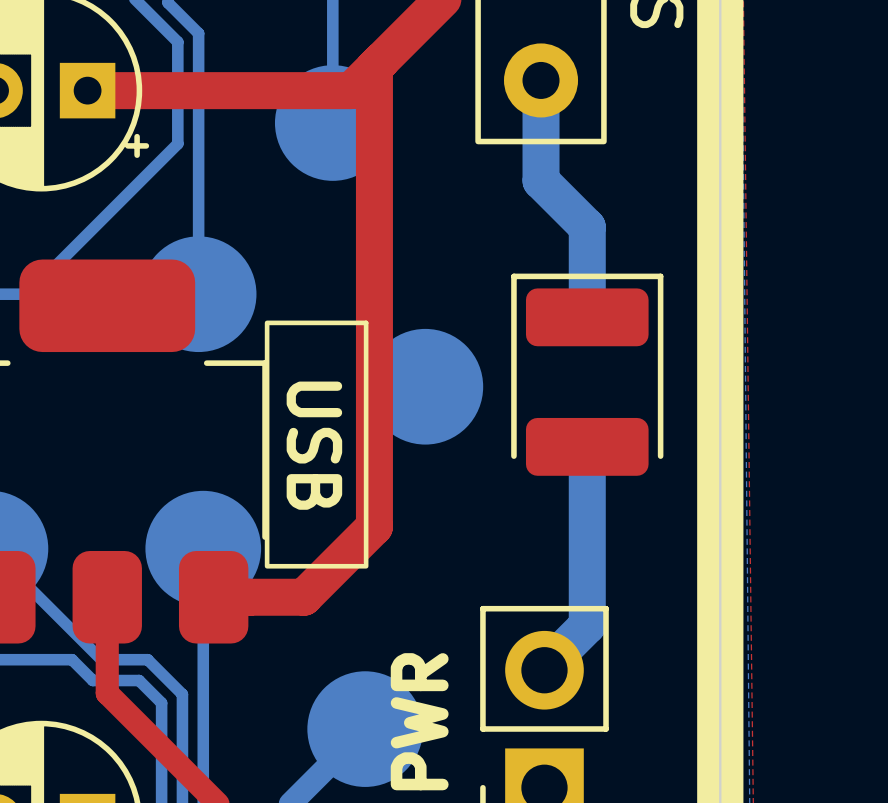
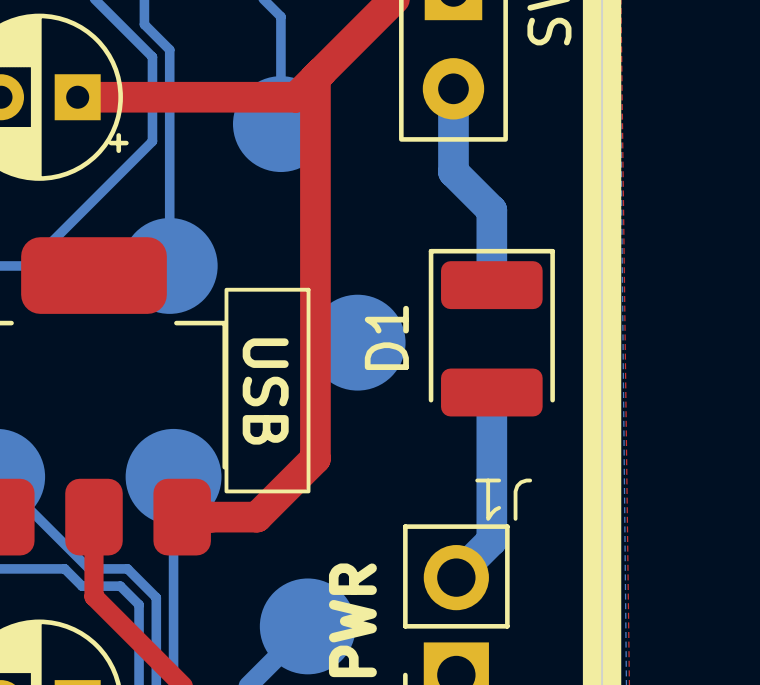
D1 name: none -> D1 (386, 337)
J1 name: none -> J1 (503, 499)

